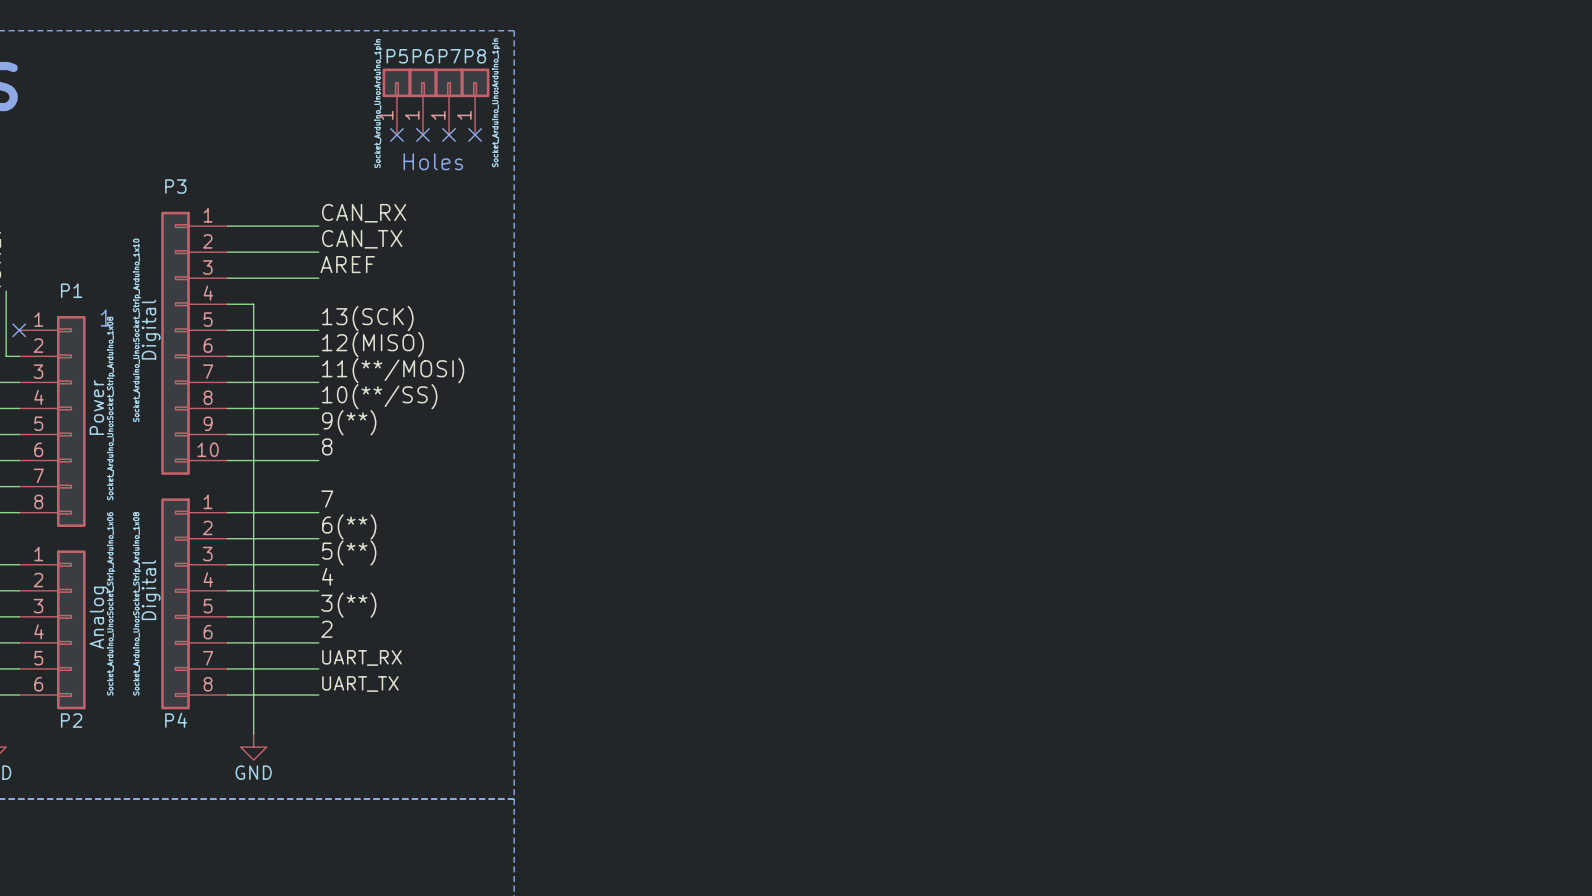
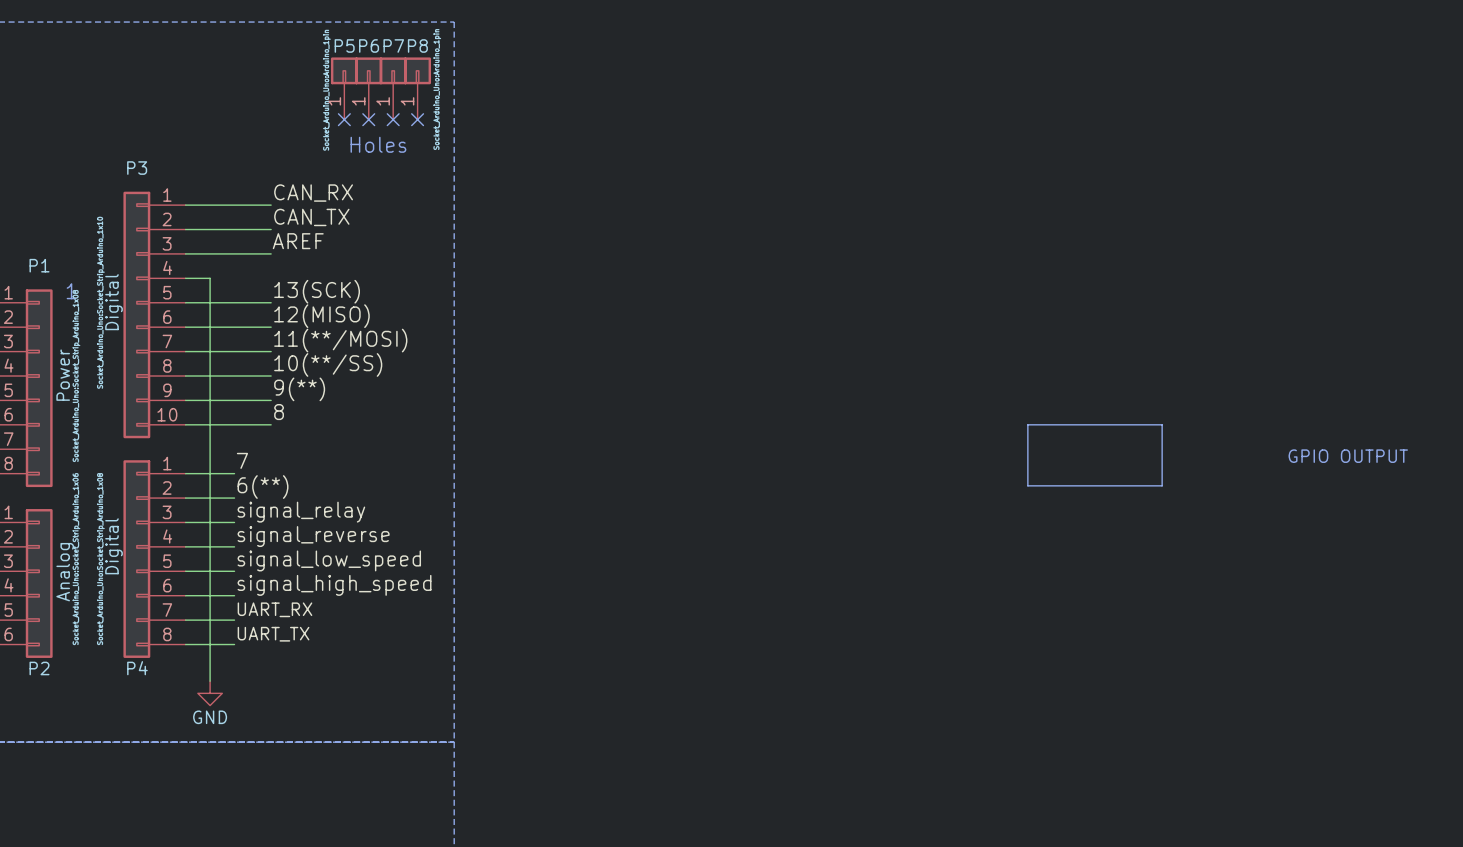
line: none -> (1027, 424) (1162, 424) (1162, 485) (1027, 485) (1027, 424)
text: none -> GPIO OUTPUT (1348, 456)
label position: 7 (327, 499) -> 7 (242, 460)
wire: (279, 512) (318, 512) -> none
label position: 6(**) (349, 526) -> 6(**) (263, 487)
wire: (279, 538) (318, 538) -> none
label: 5(**) (349, 552) -> none
label: none -> signal_relay (301, 512)
wire: (279, 564) (318, 564) -> none
label: 4 (327, 576) -> none
label: none -> signal_reverse (313, 536)
wire: (279, 590) (318, 590) -> none
label: 3(**) (348, 605) -> none
label: none -> signal_low_speed (329, 560)
wire: (279, 616) (318, 616) -> none
label: 2 (326, 629) -> none
label: none -> signal_high_speed (334, 585)
wire: (279, 642) (318, 642) -> none
label position: UART_RX (361, 657) -> UART_RX (274, 609)
wire: (279, 668) (318, 668) -> none
label position: UART_TX (360, 684) -> UART_TX (273, 634)
wire: (279, 695) (318, 695) -> none

